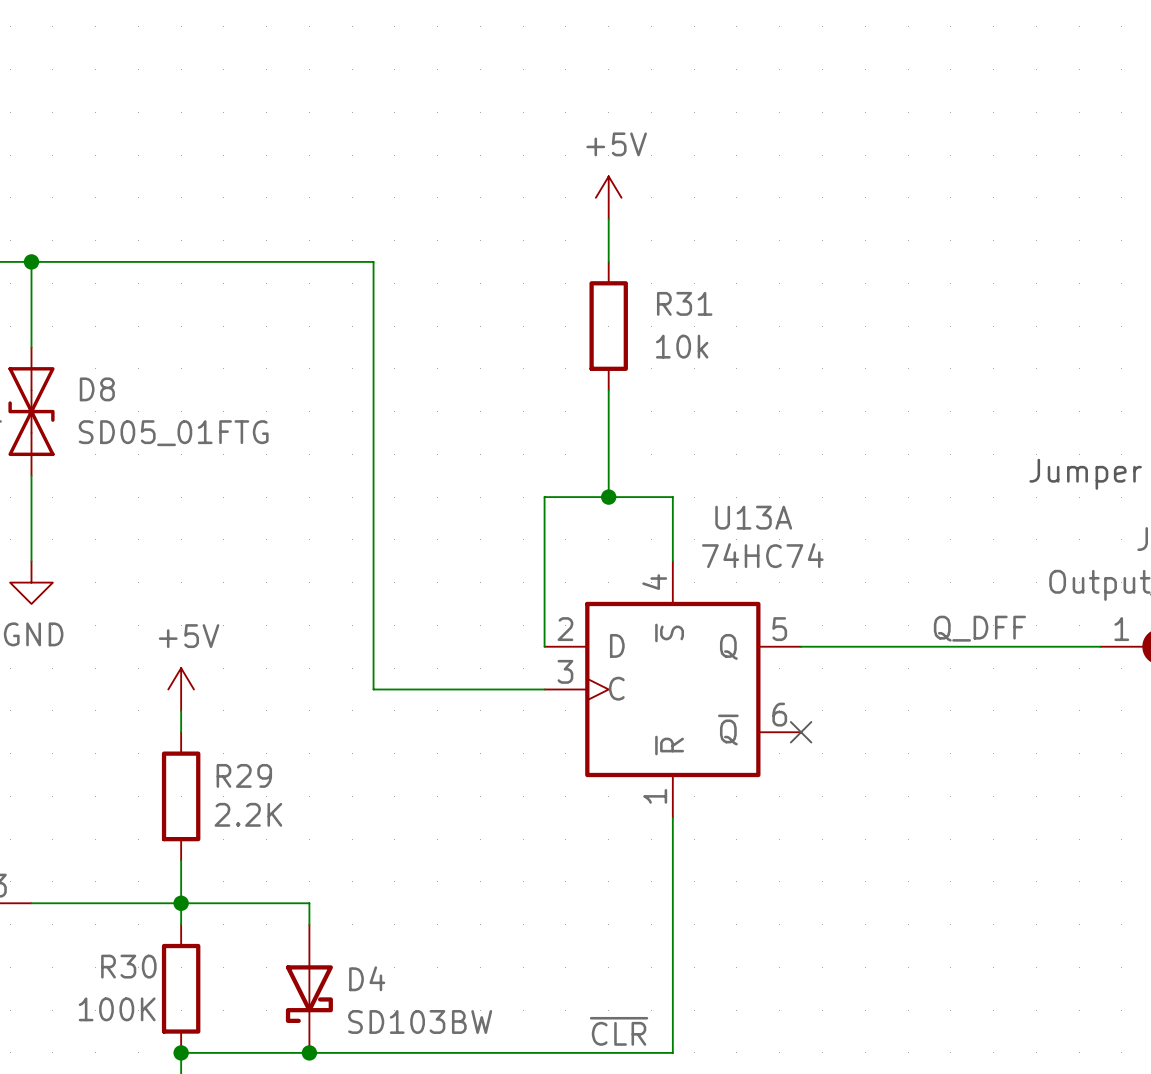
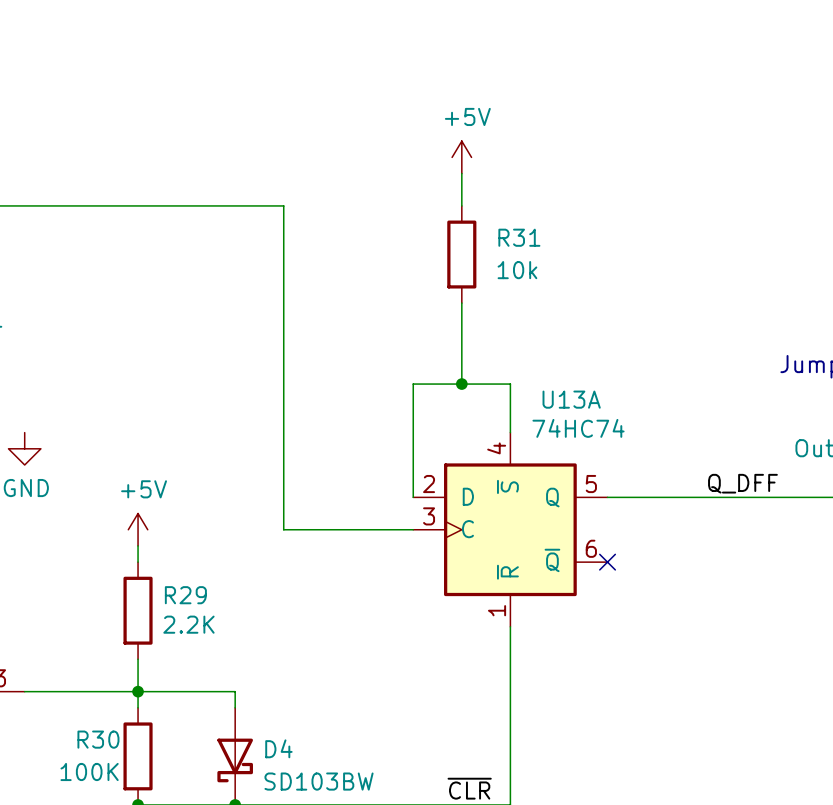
wire: (31, 261) (31, 347) -> none
junction: (31, 261) -> none
D8: SD05_01FTG (31, 411) -> none
wire: (31, 475) (31, 561) -> none

